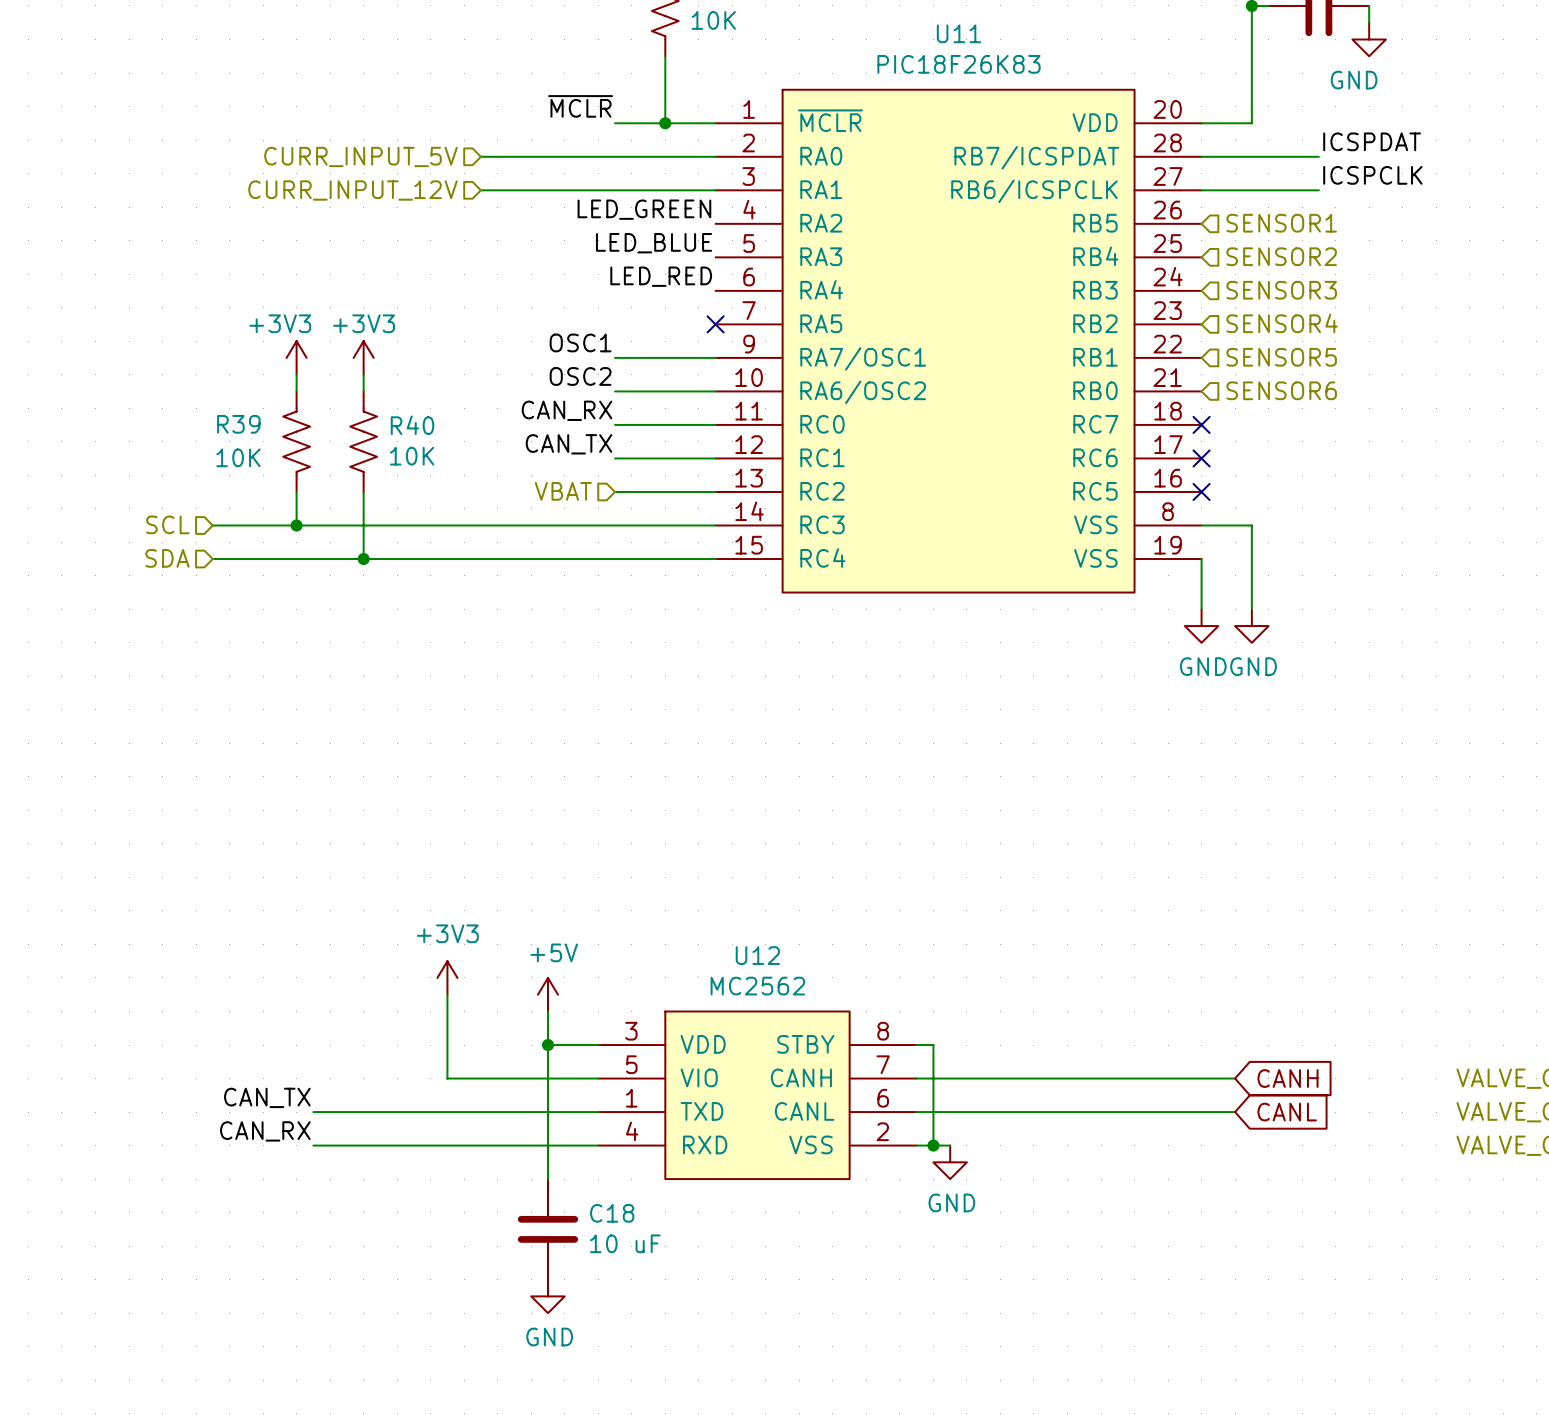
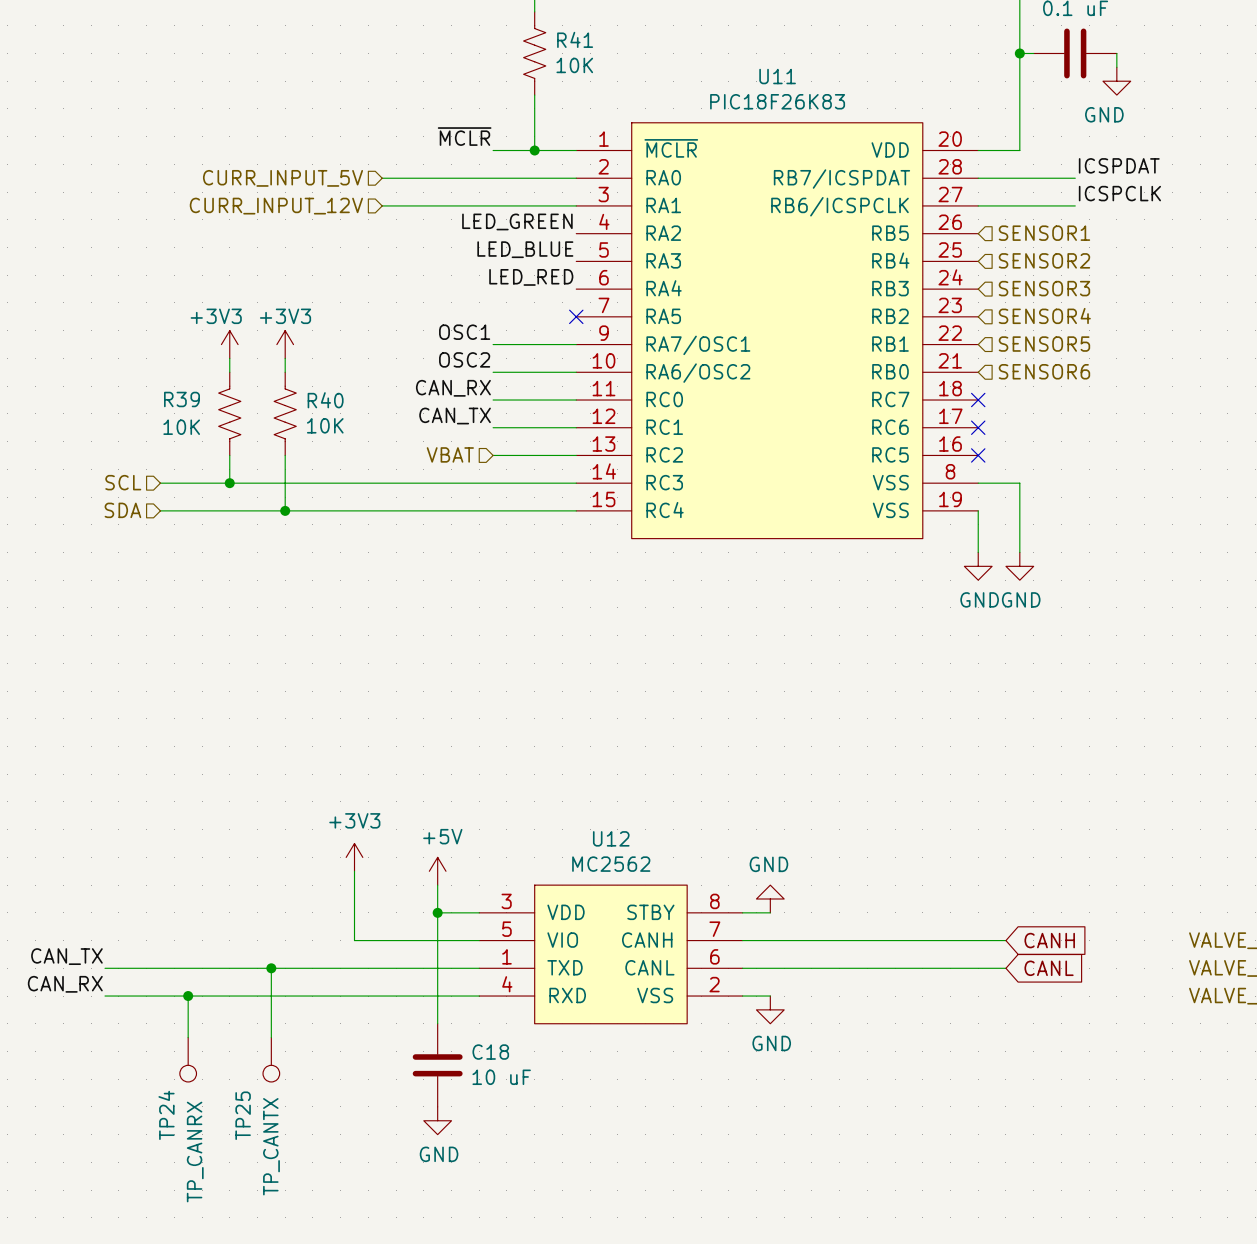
power symbol: none -> GND (770, 898)
wire: (933, 1045) (933, 1145) -> (756, 912) (770, 912)
label position: CAN_TX (267, 1097) -> CAN_TX (66, 956)
wire: none -> (105, 968) (243, 968)
wire: none -> (271, 968) (271, 1037)
junction: none -> (271, 968)
label position: CAN_RX (265, 1131) -> CAN_RX (65, 984)
wire: none -> (105, 996) (243, 996)
wire: none -> (188, 996) (188, 1037)
junction: none -> (188, 996)
junction: (933, 1145) -> none
TP24: none -> TP_CANRX (188, 1059)
TP25: none -> TP_CANTX (271, 1059)

